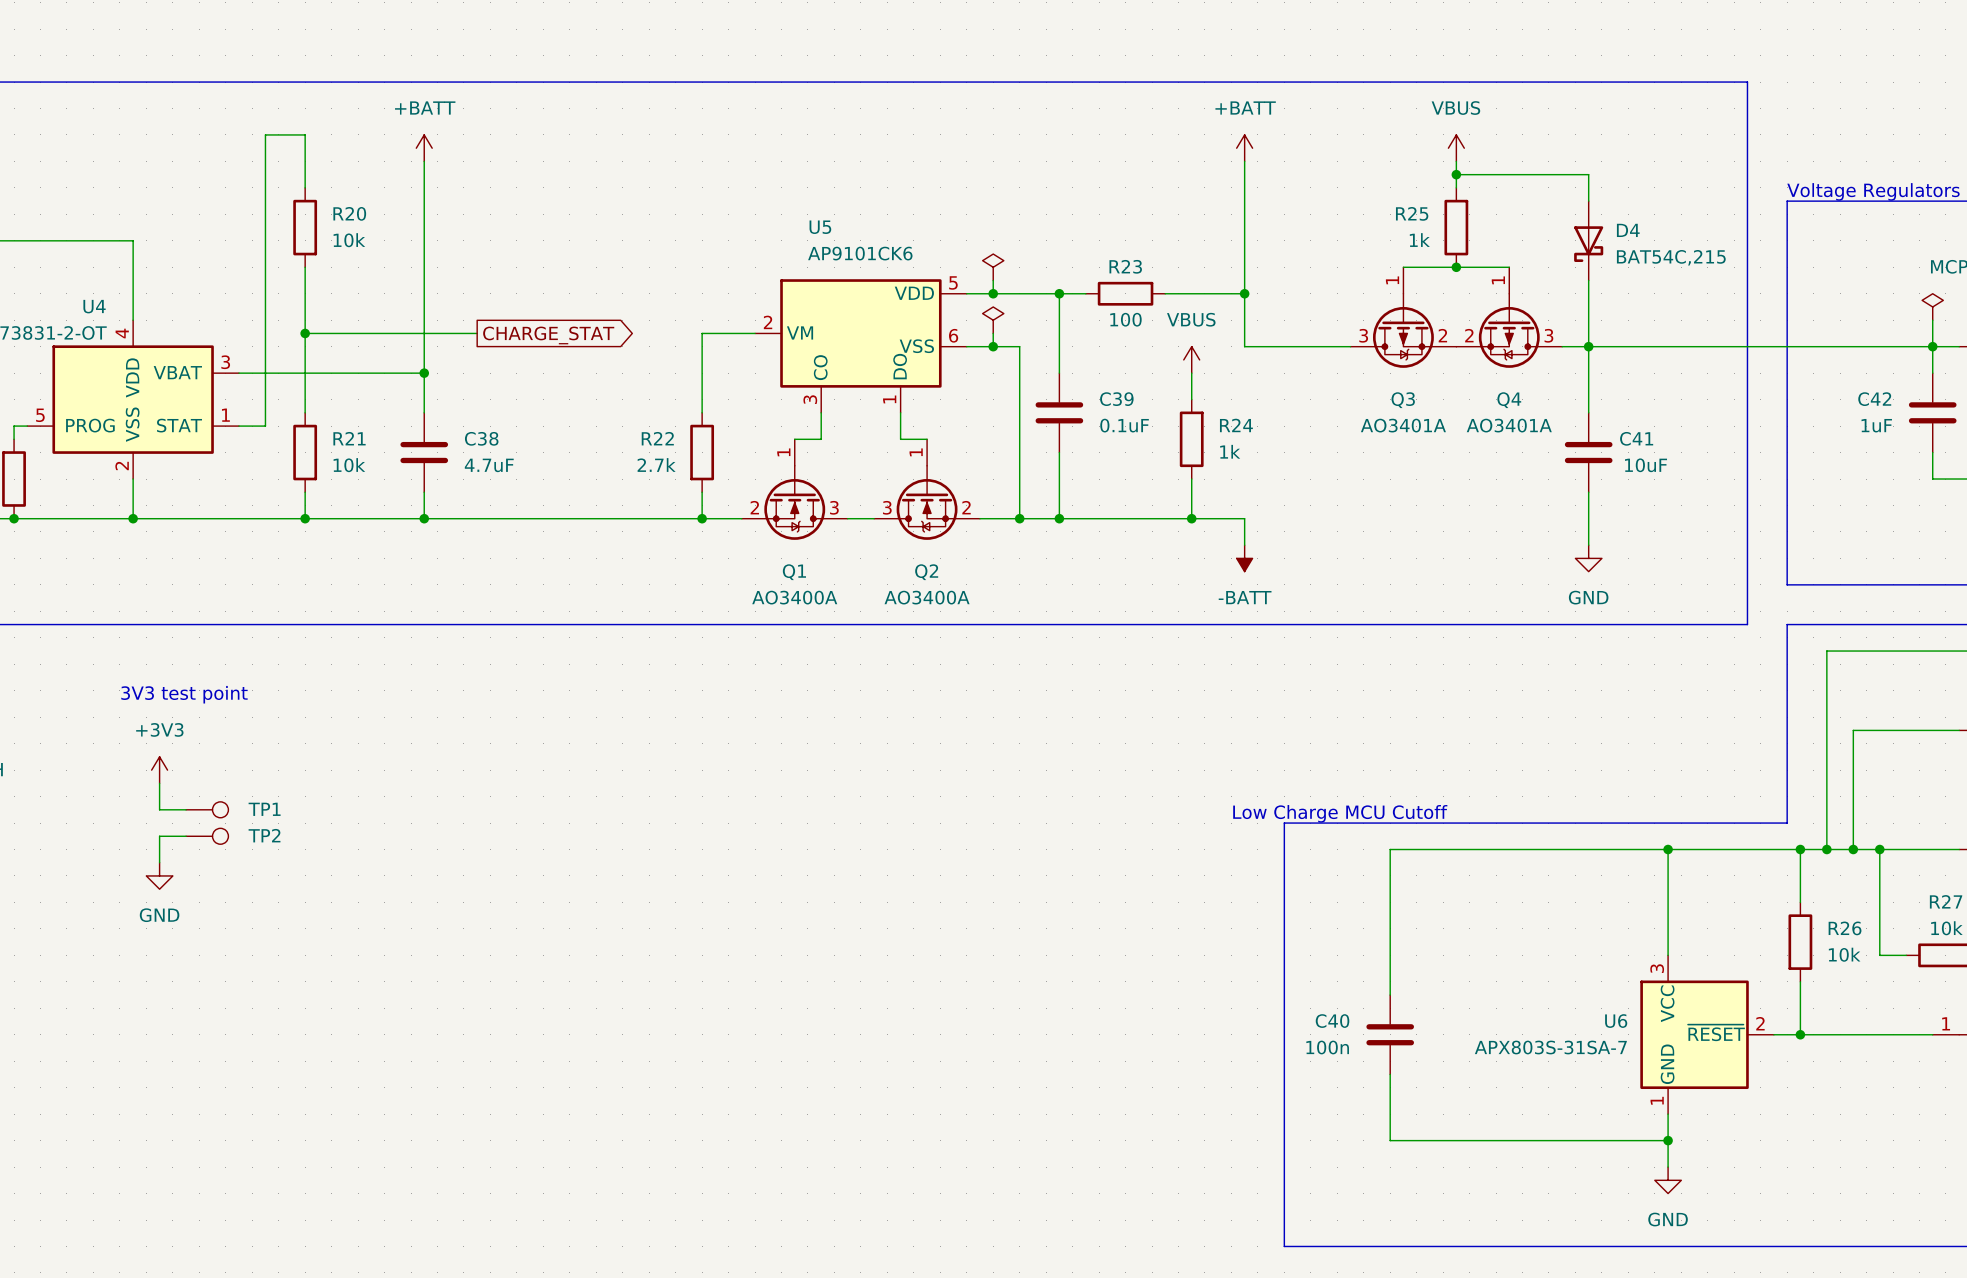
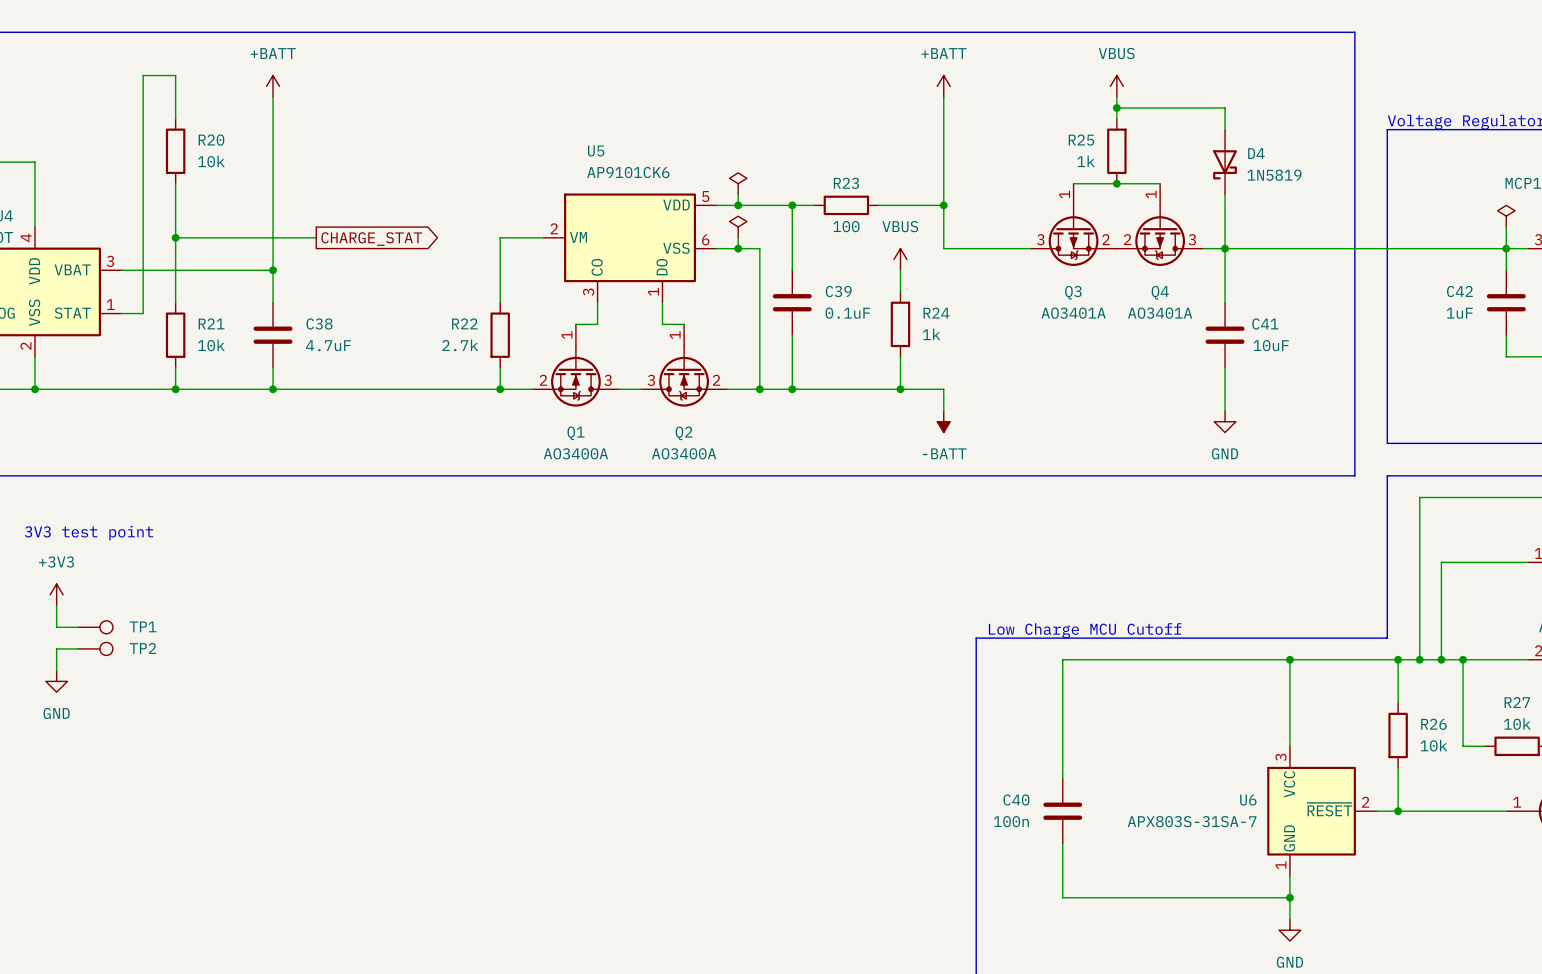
D4 value: BAT54C,215 (1671, 257) -> 1N5819 (1274, 175)
text position: Low Charge MCU Cutoff (1340, 813) -> Low Charge MCU Cutoff (1085, 630)

